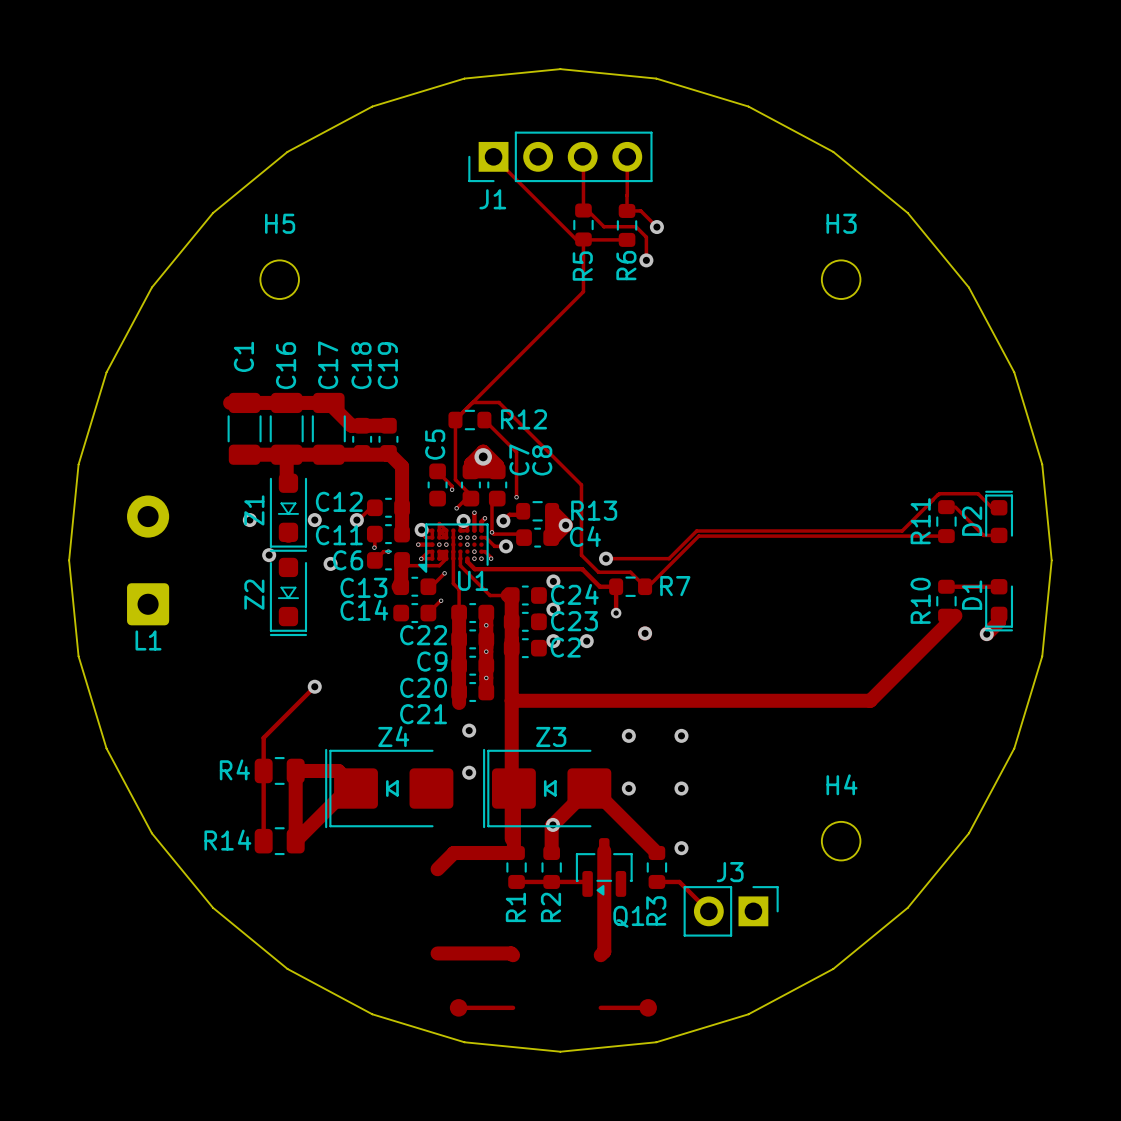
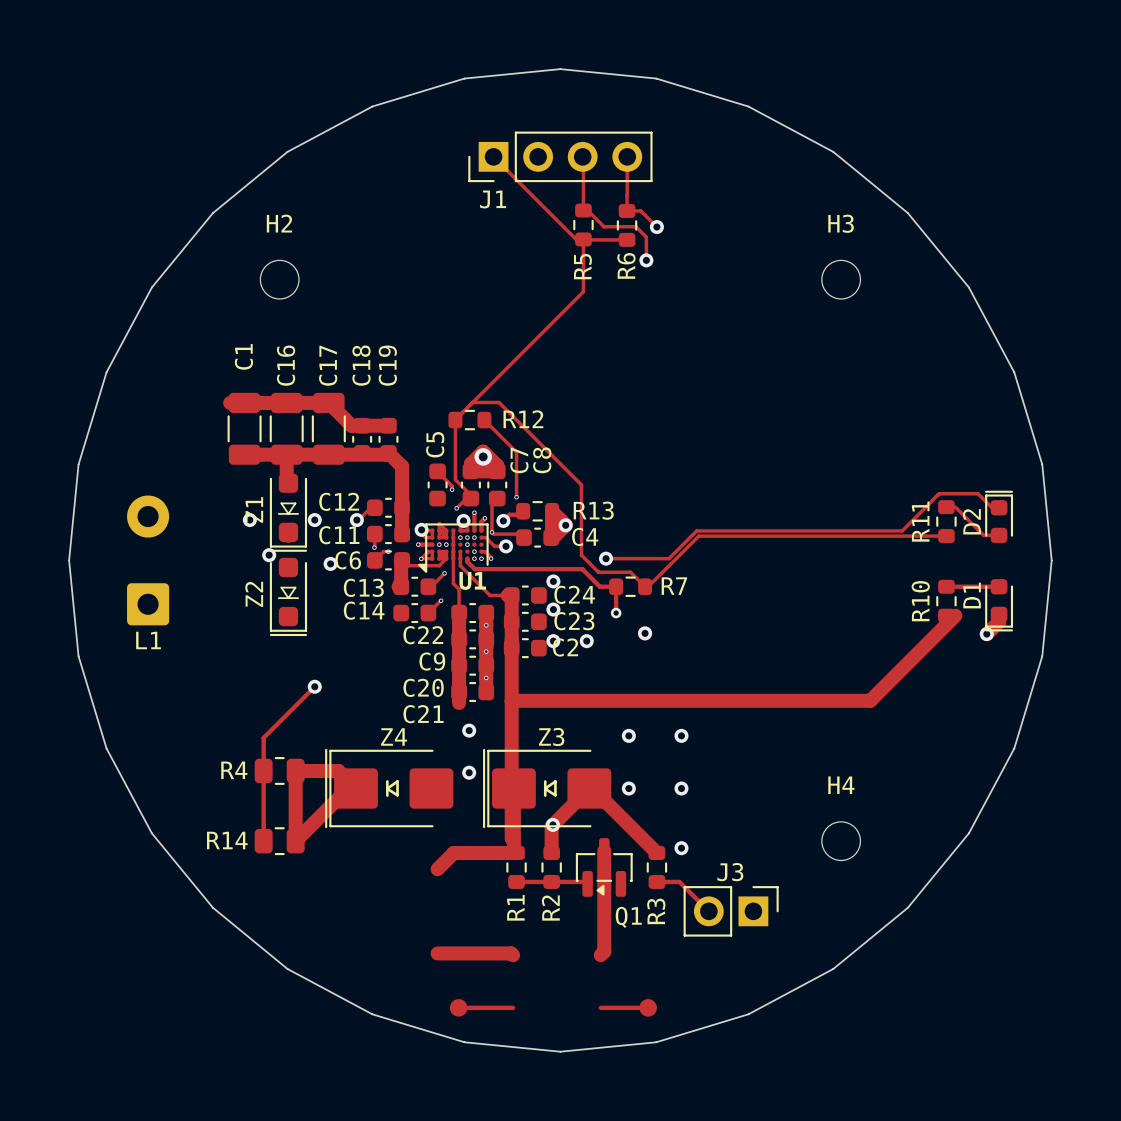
H5 name: H5 (280, 223) -> H2 (279, 223)

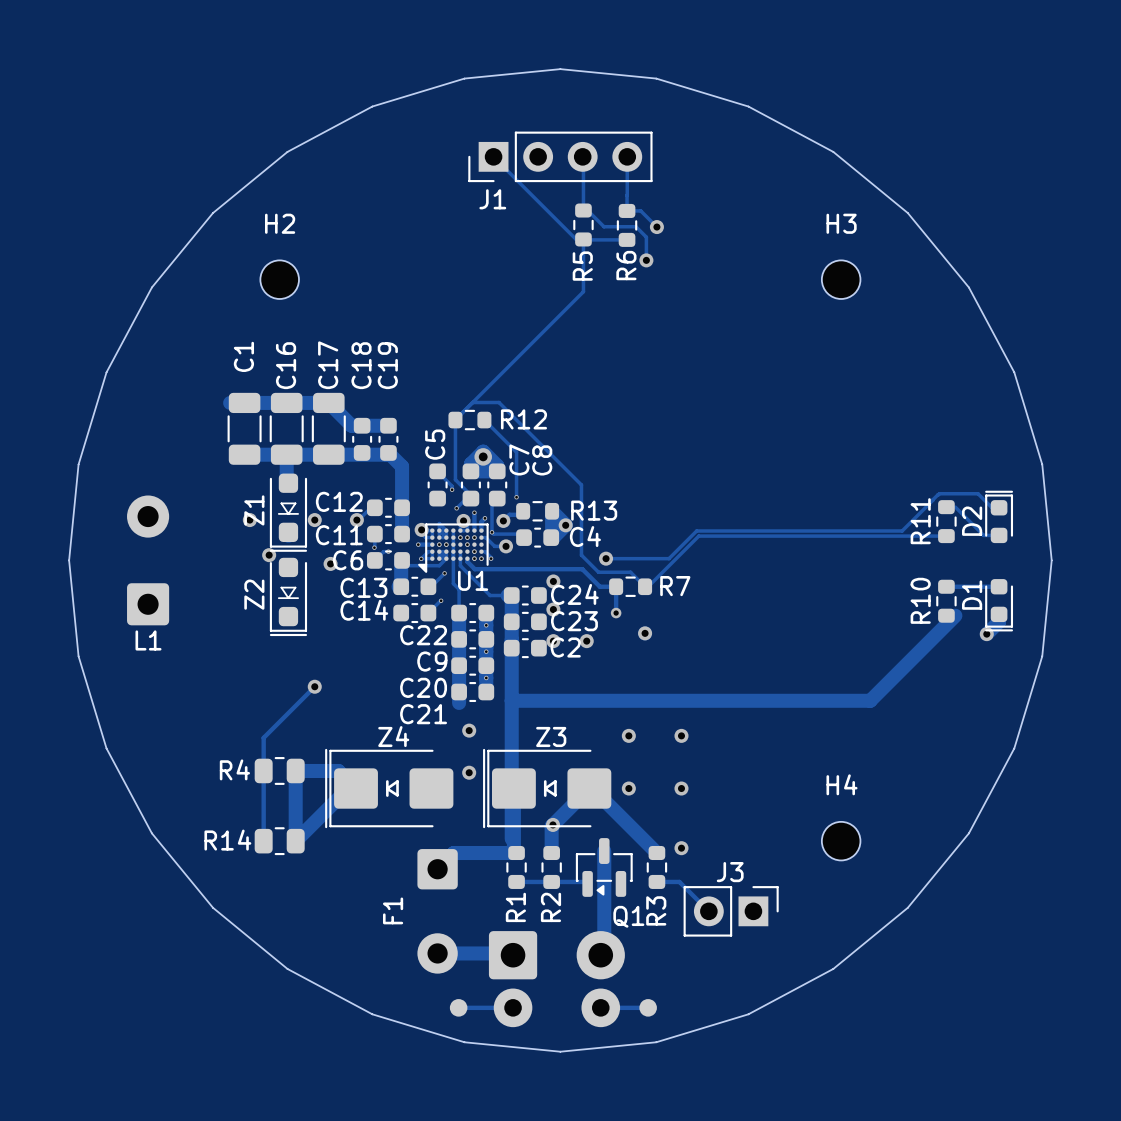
F1: none -> (437, 911)
part: none -> (556, 979)

